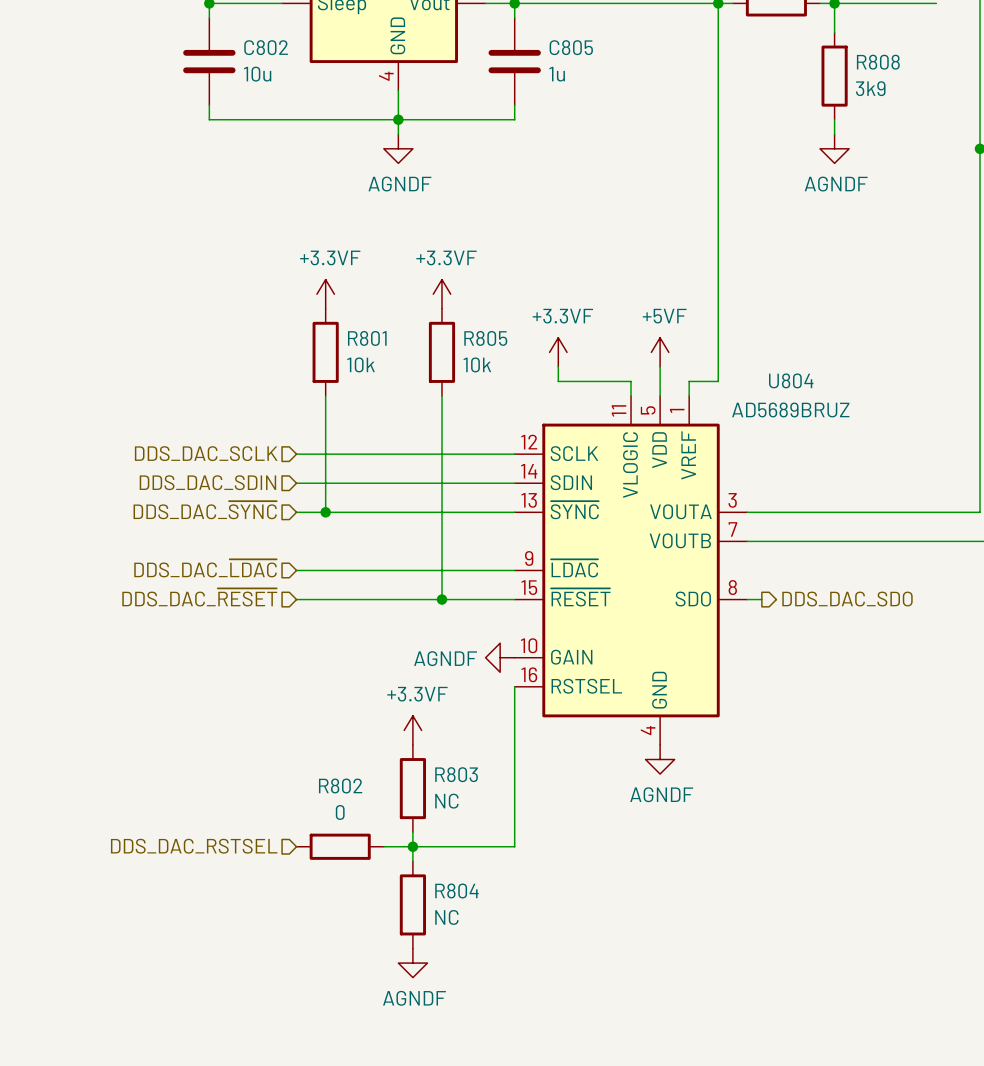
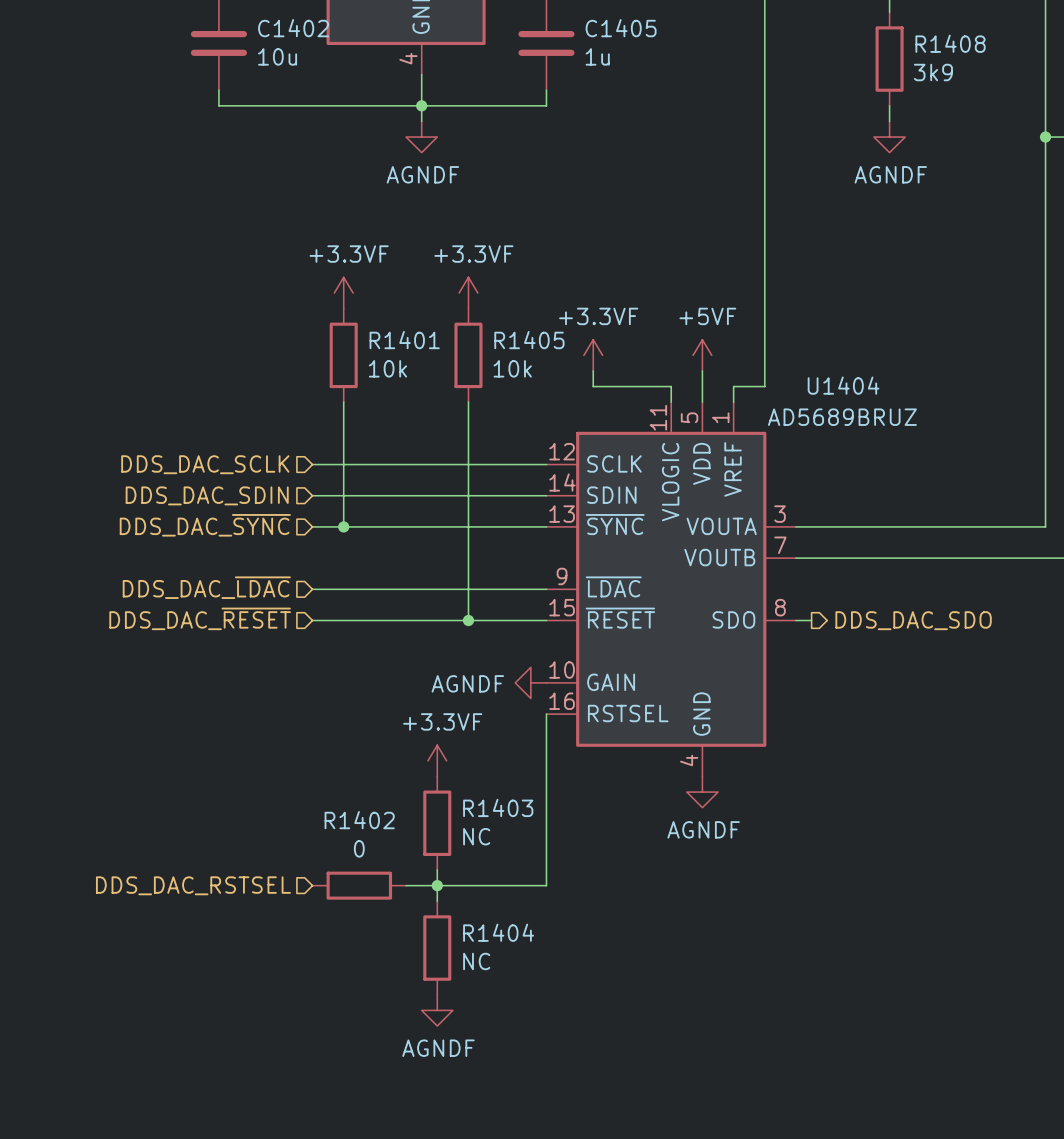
C802 name: C802 (266, 47) -> C1402 (293, 28)
C805 name: C805 (571, 47) -> C1405 (621, 28)
R808 name: R808 (878, 62) -> R1408 (950, 43)
R801 name: R801 (367, 338) -> R1401 (404, 340)
R805 name: R805 (485, 338) -> R1405 (529, 340)
U804 name: U804 (791, 380) -> U1404 (843, 385)
R803 name: R803 (456, 774) -> R1403 (498, 807)
R802 name: R802 (340, 786) -> R1402 (359, 820)
R804 name: R804 (456, 890) -> R1404 (498, 932)

